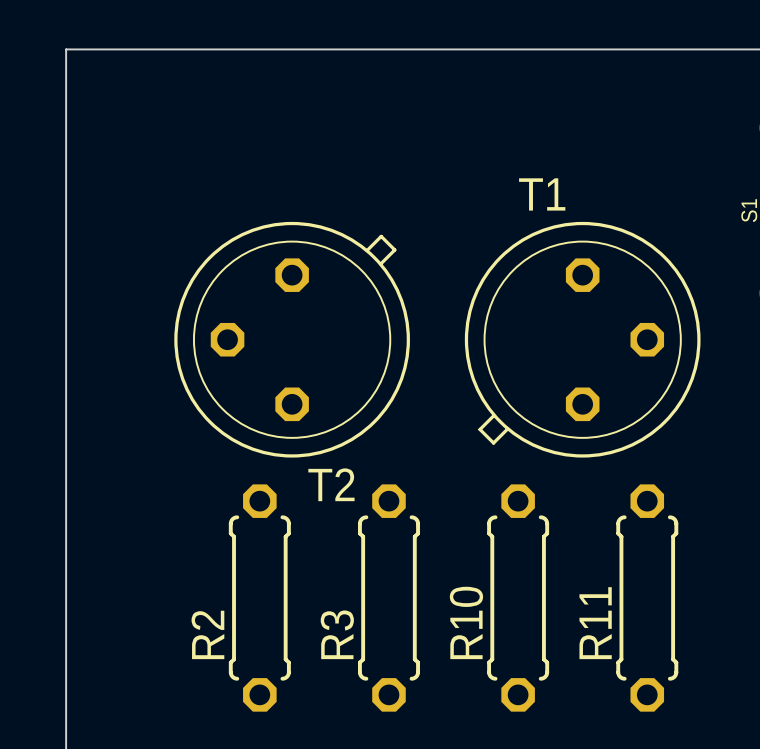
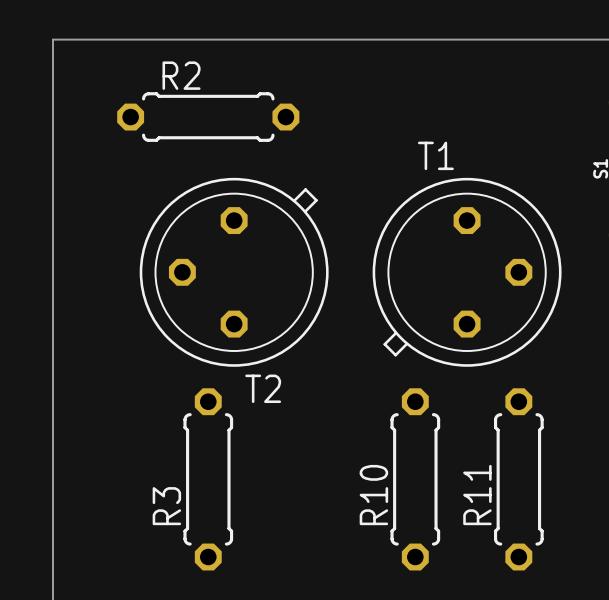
R2: none -> (208, 117)
R3: (388, 598) -> none
R2 name: R2 (207, 634) -> R3 (166, 506)

